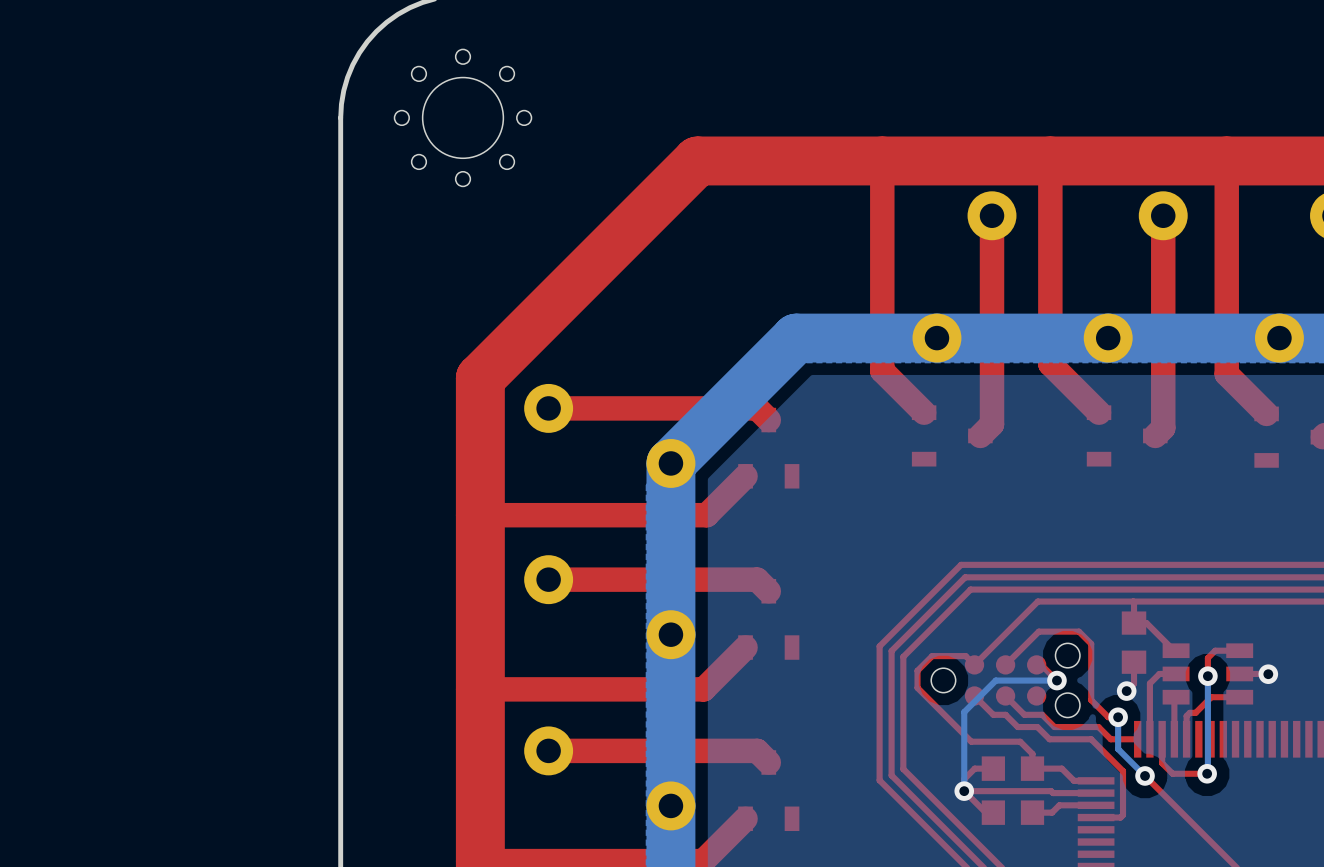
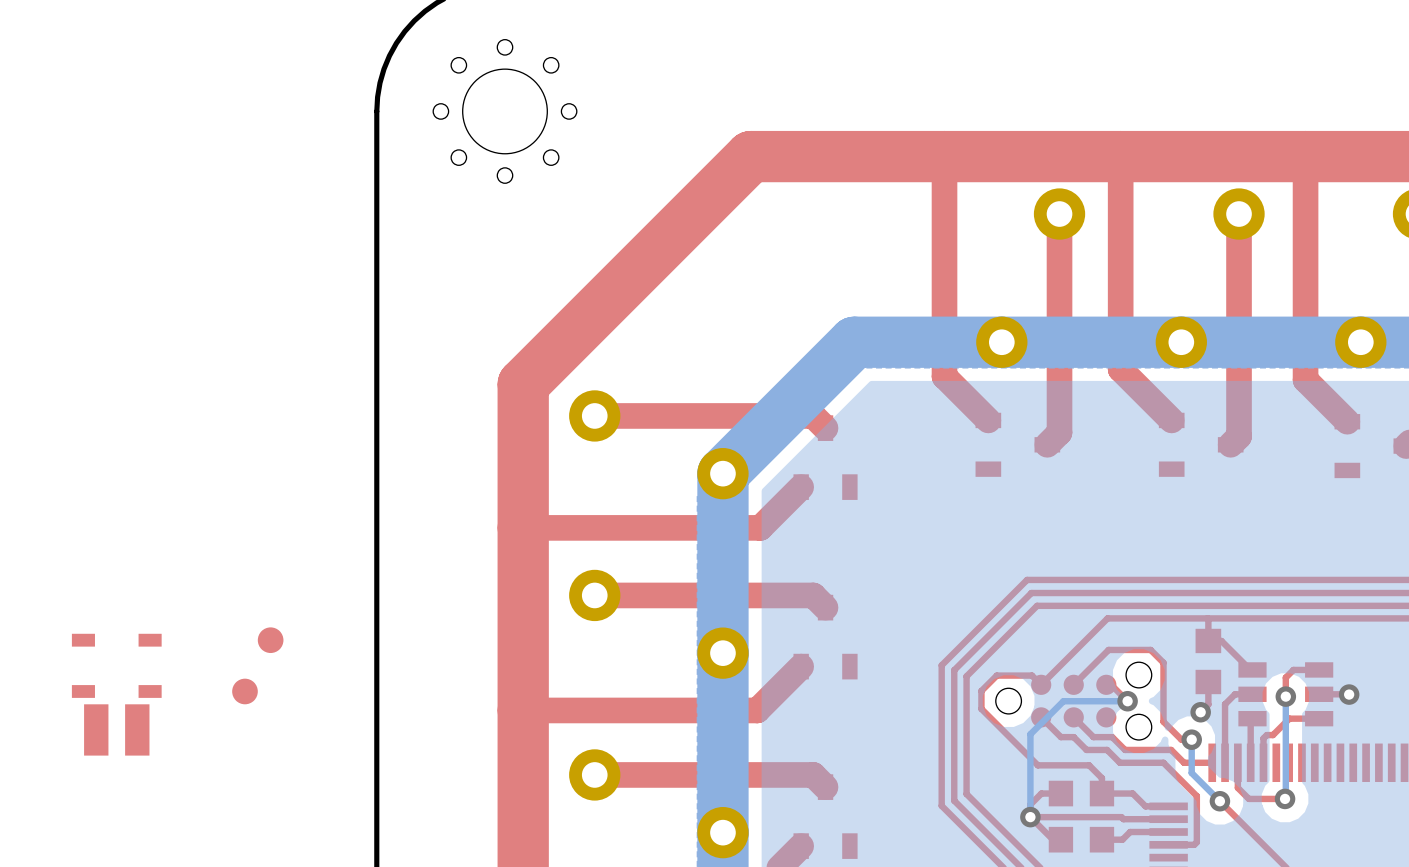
part: none -> (116, 640)
part: none -> (270, 640)
part: none -> (116, 691)
part: none -> (244, 691)
part: none -> (116, 717)
part: none -> (116, 742)

